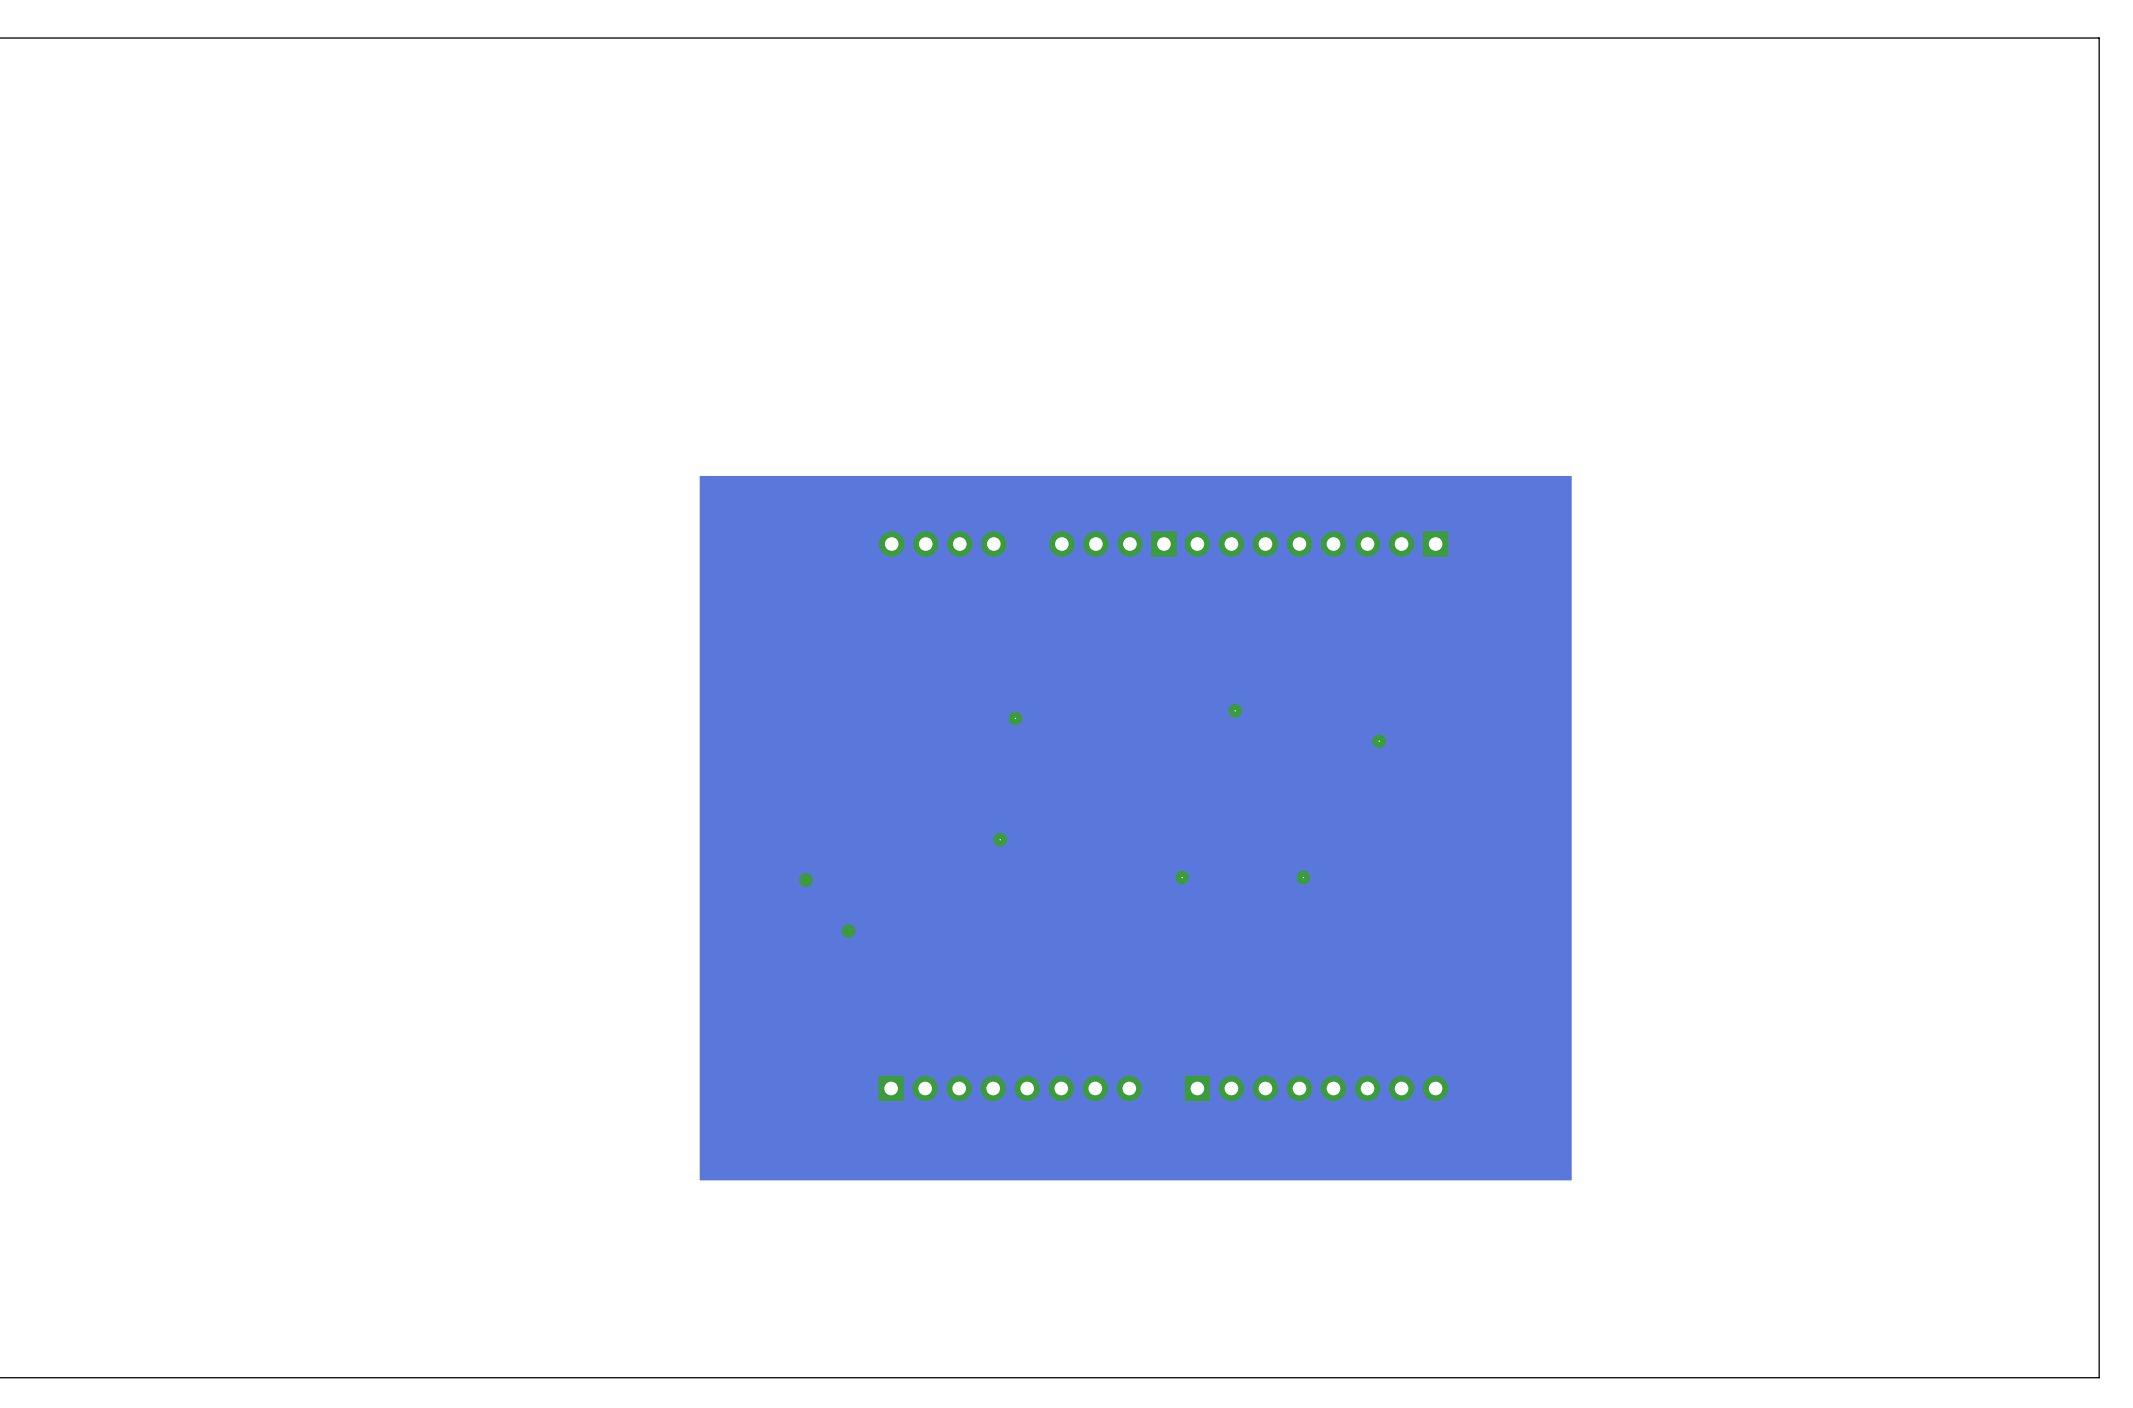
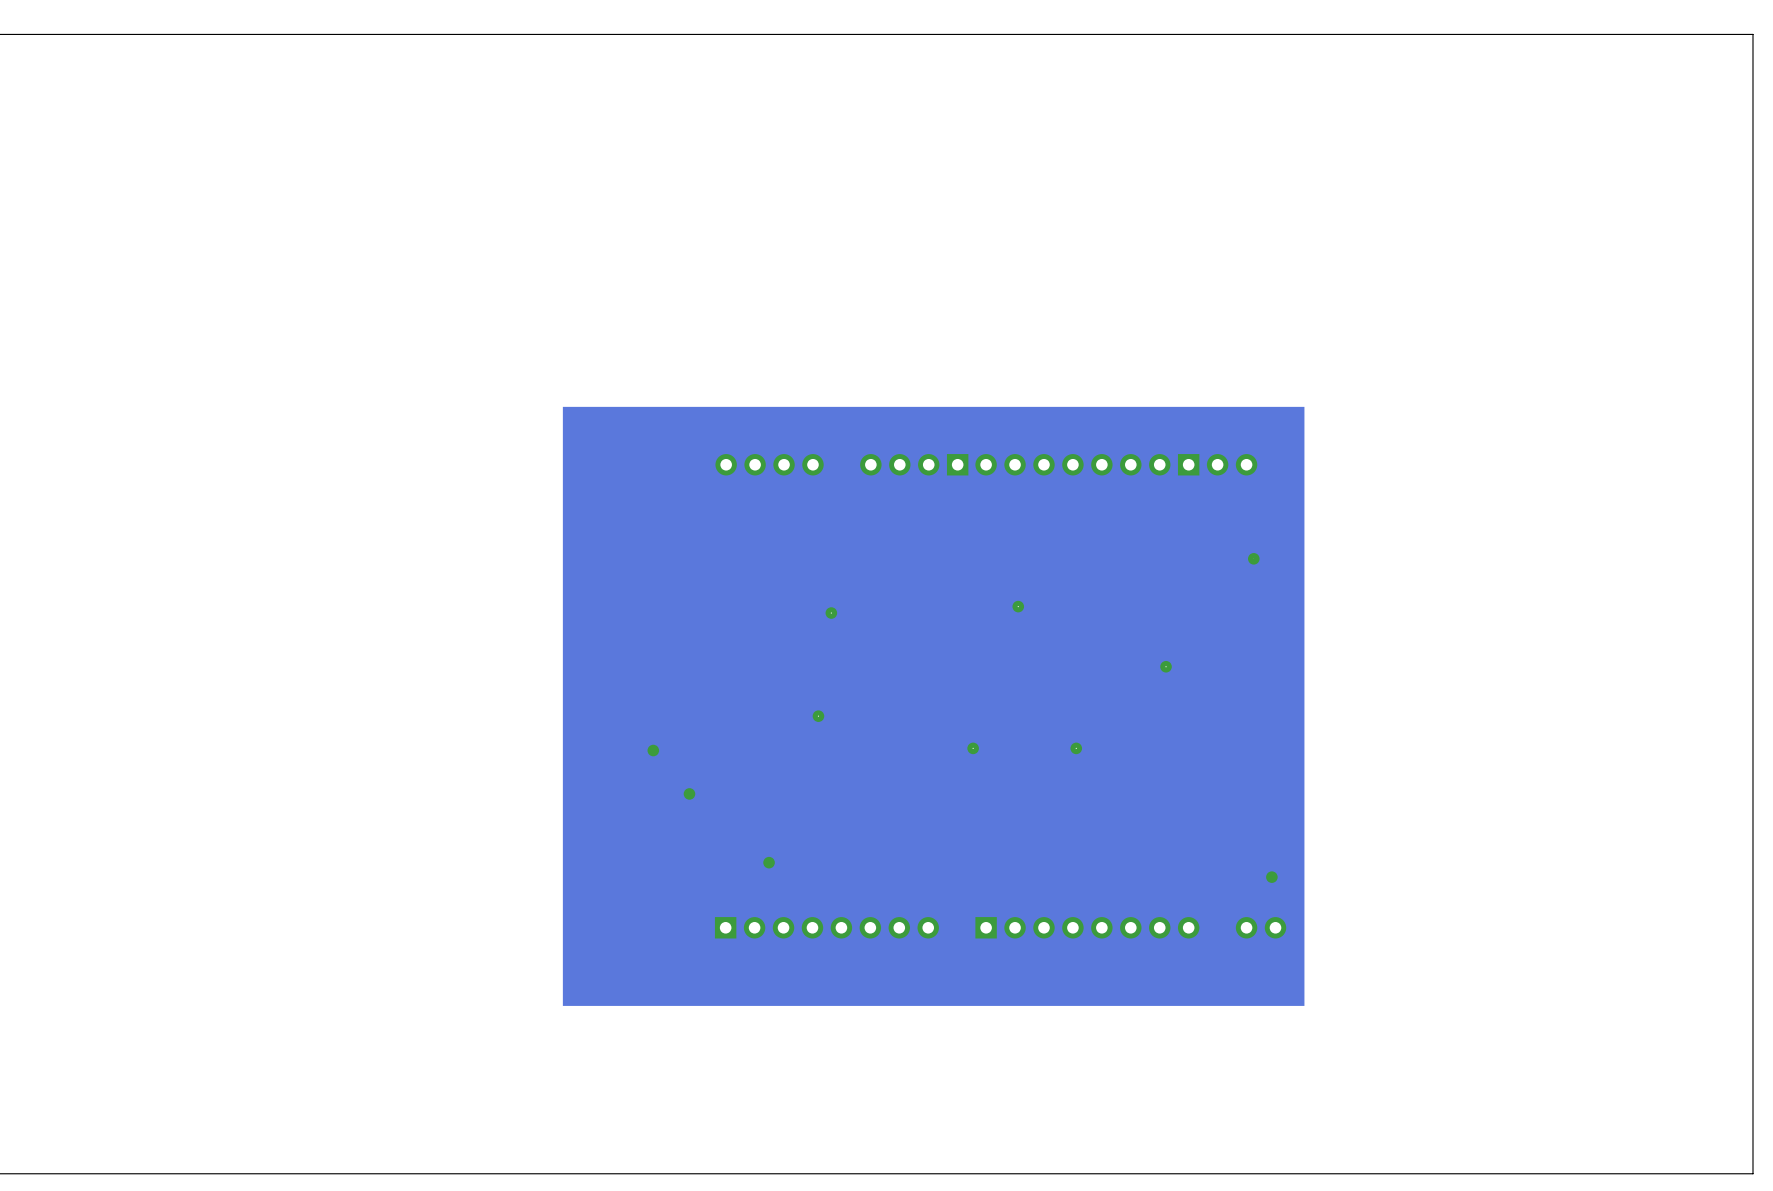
part: none -> (1232, 464)
via: none -> (1253, 558)
via position: (1379, 741) -> (1166, 666)
via: none -> (769, 862)
via: none -> (1271, 877)
part: none -> (1261, 927)

